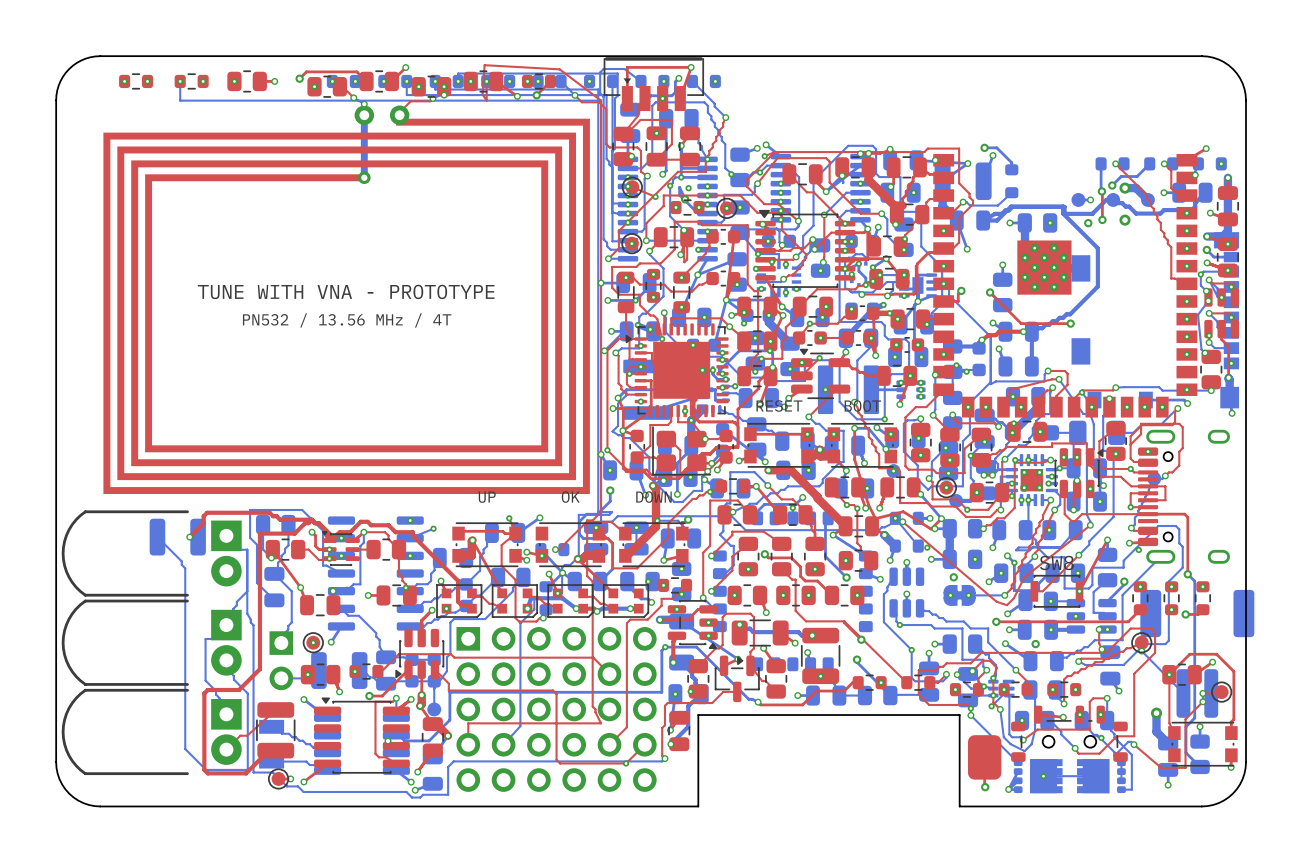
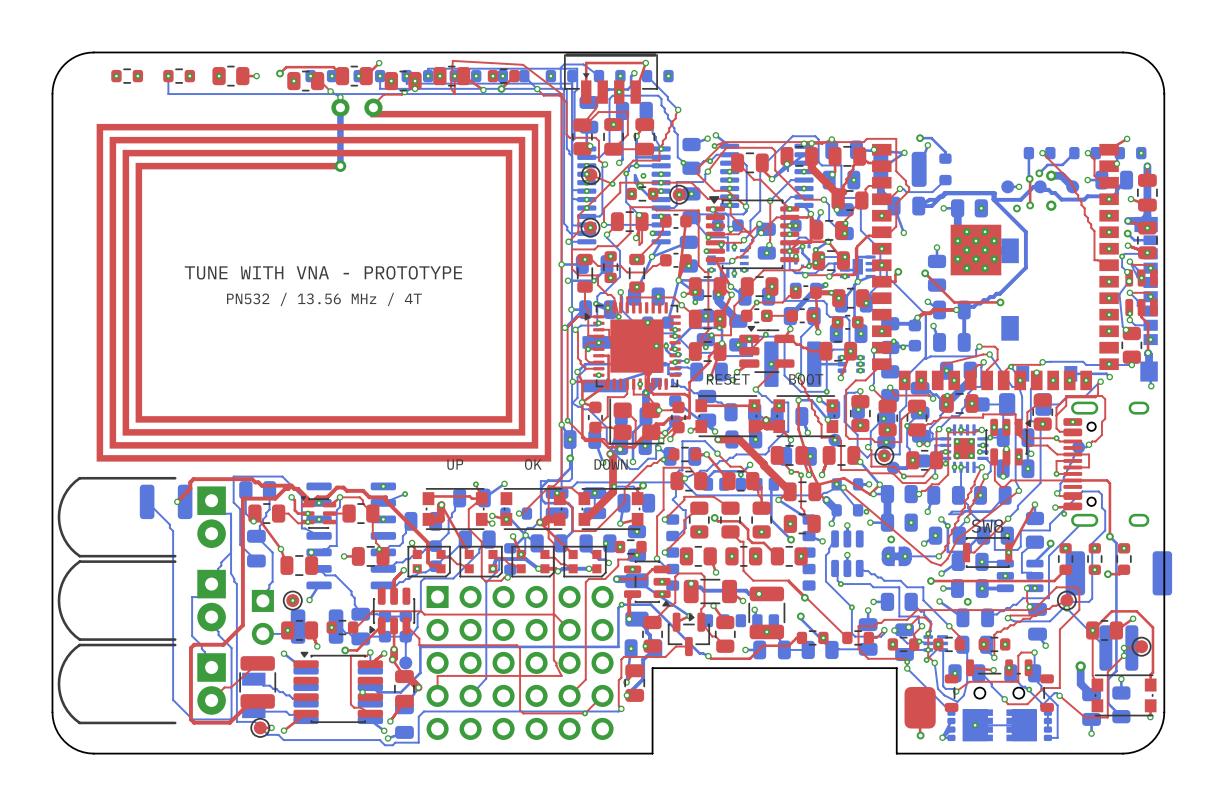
bottom track: (598, 89) (598, 512) (612, 512) -> (572, 198) (572, 478)
bottom track: none -> (559, 83) (572, 83) (572, 141)

